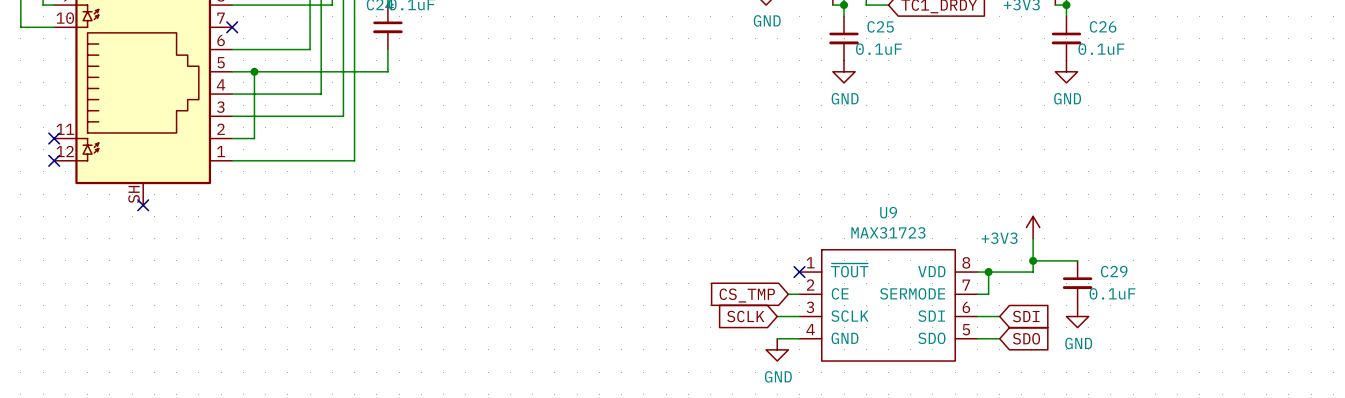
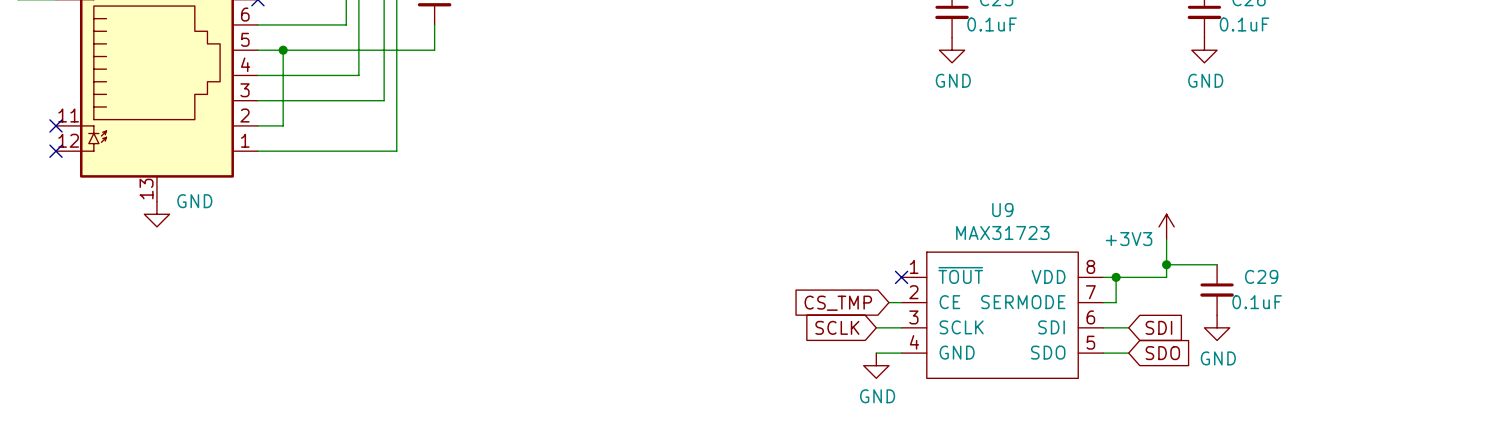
part pin number: SH (134, 194) -> 13 (146, 189)
no-connect mark: (143, 205) -> none
power symbol: none -> GND (156, 214)

